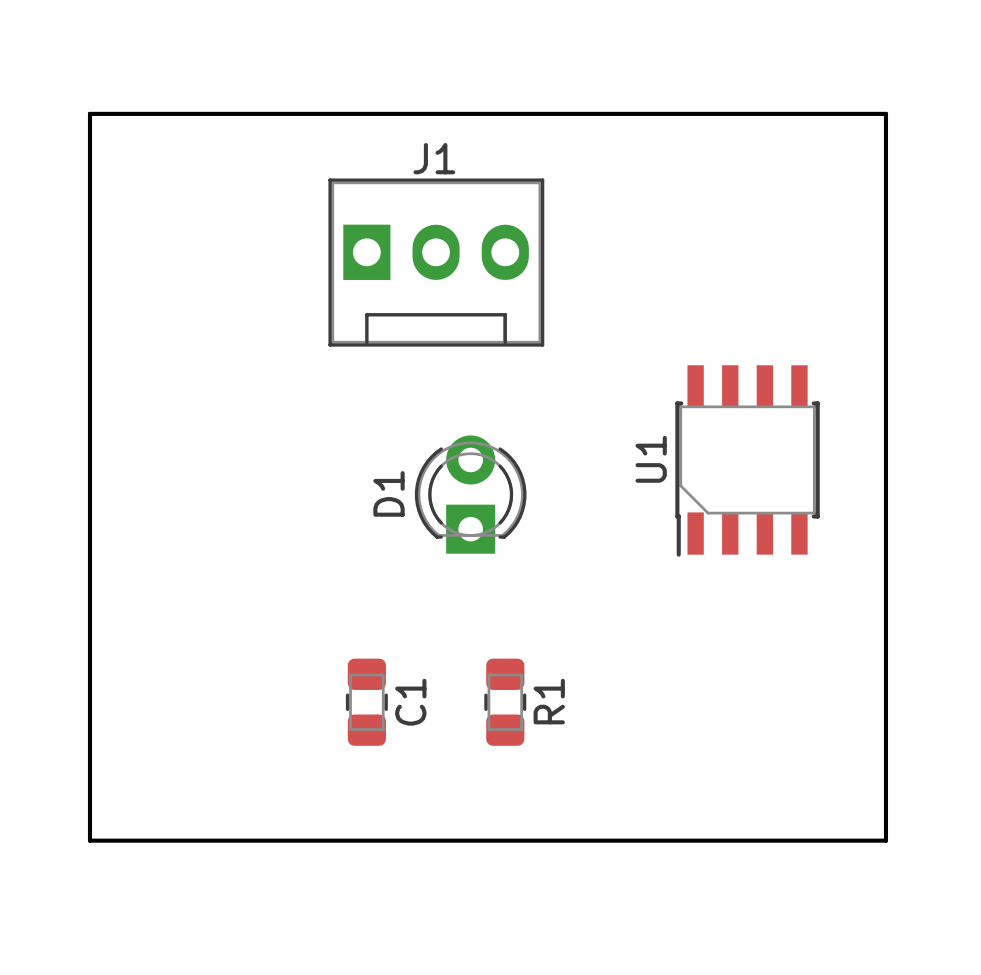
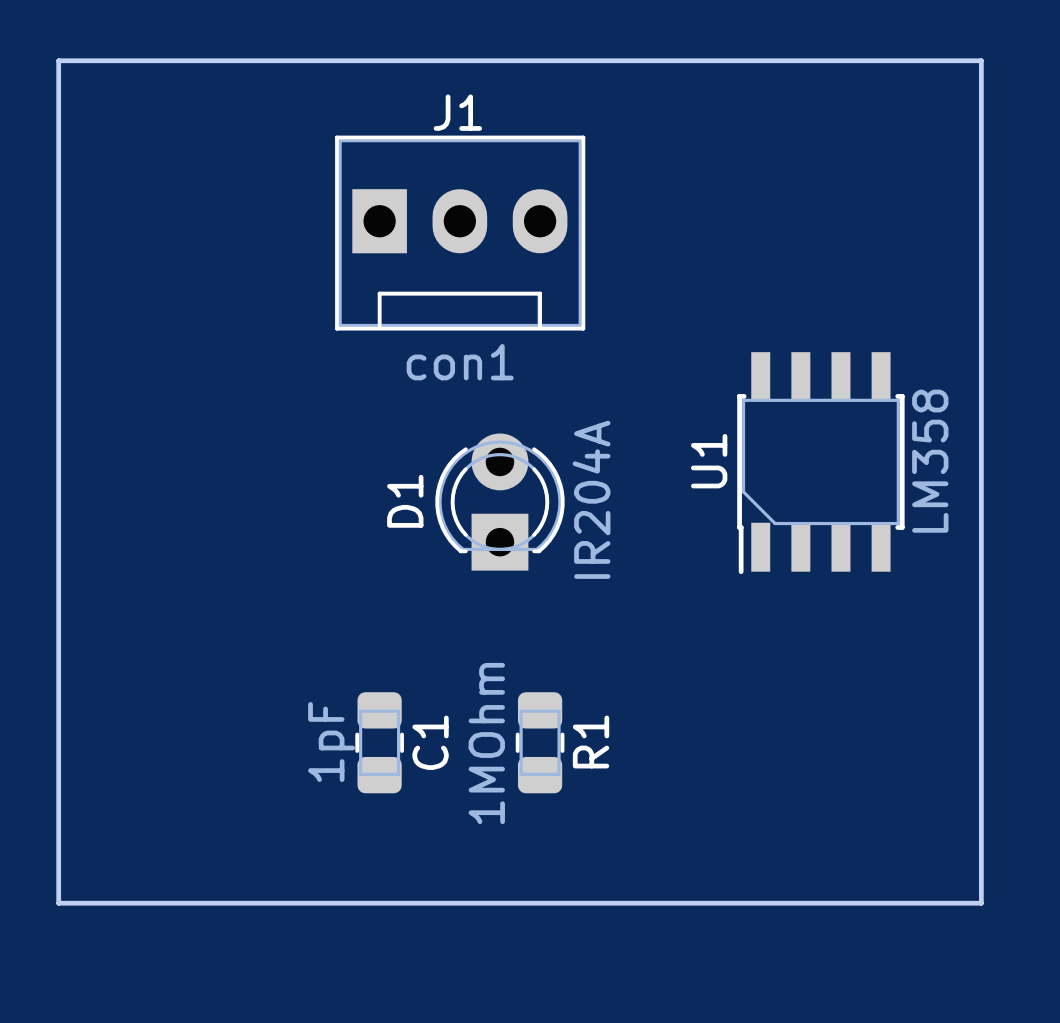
J1 value: none -> con1 (460, 362)
U1 value: none -> LM358 (930, 461)
D1 value: none -> IR204A (591, 499)
C1 value: none -> 1pF (331, 742)
R1 value: none -> 1MOhm (486, 743)

